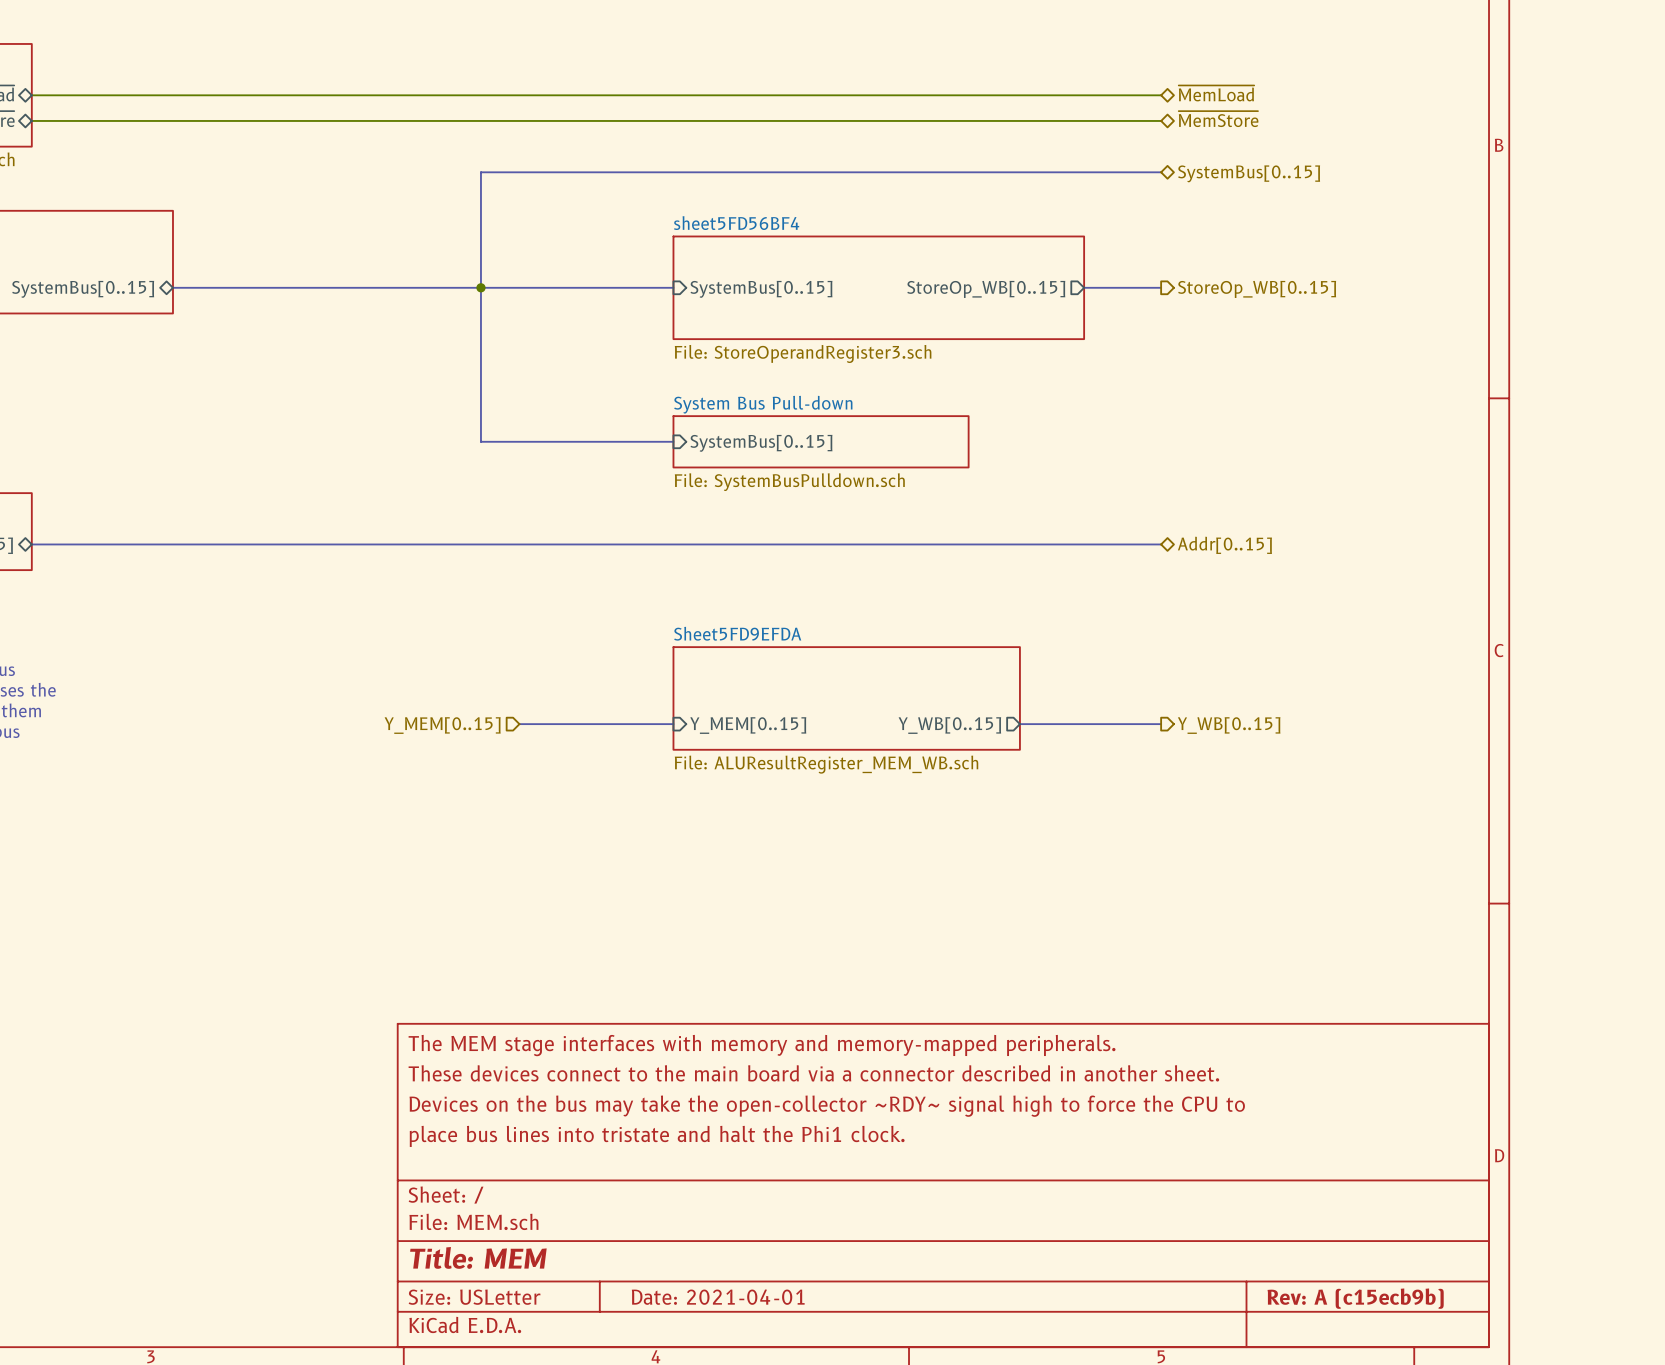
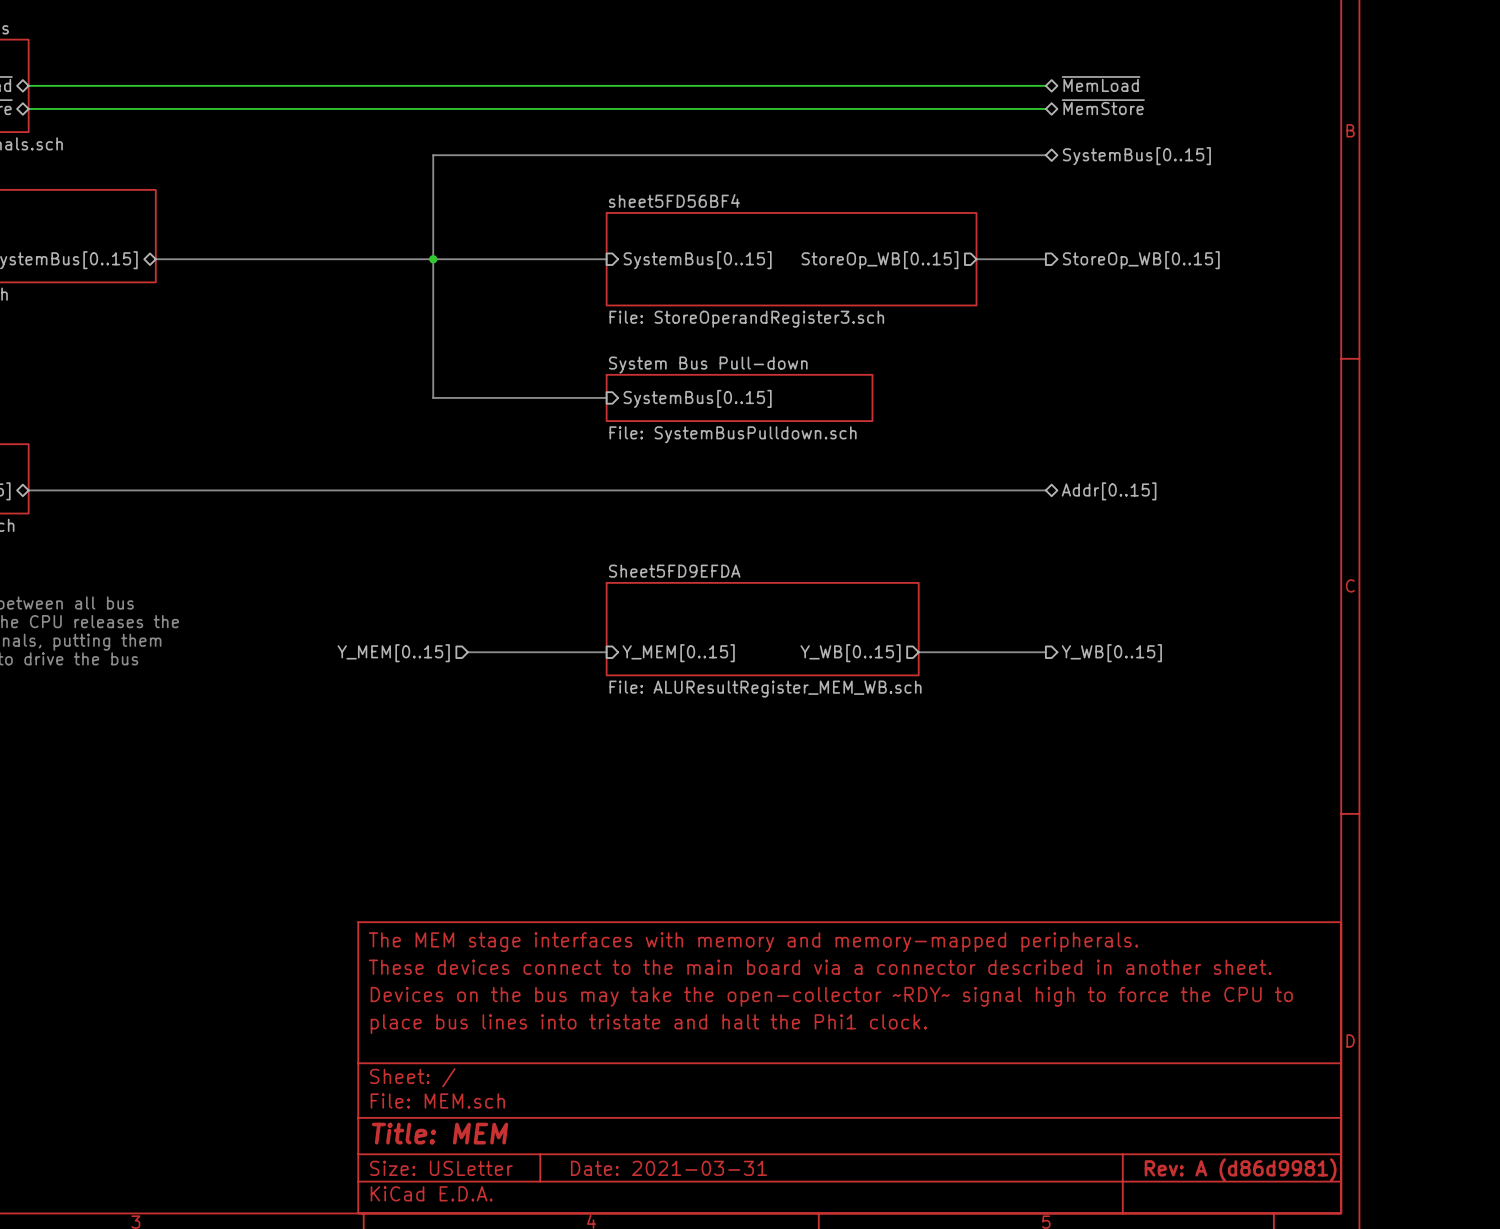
title block: Date: 2021-04-01 (718, 1297) -> Date: 2021-03-31 (668, 1168)
title block: Rev: A (c15ecb9b) (1355, 1298) -> Rev: A (d86d9981) (1240, 1169)

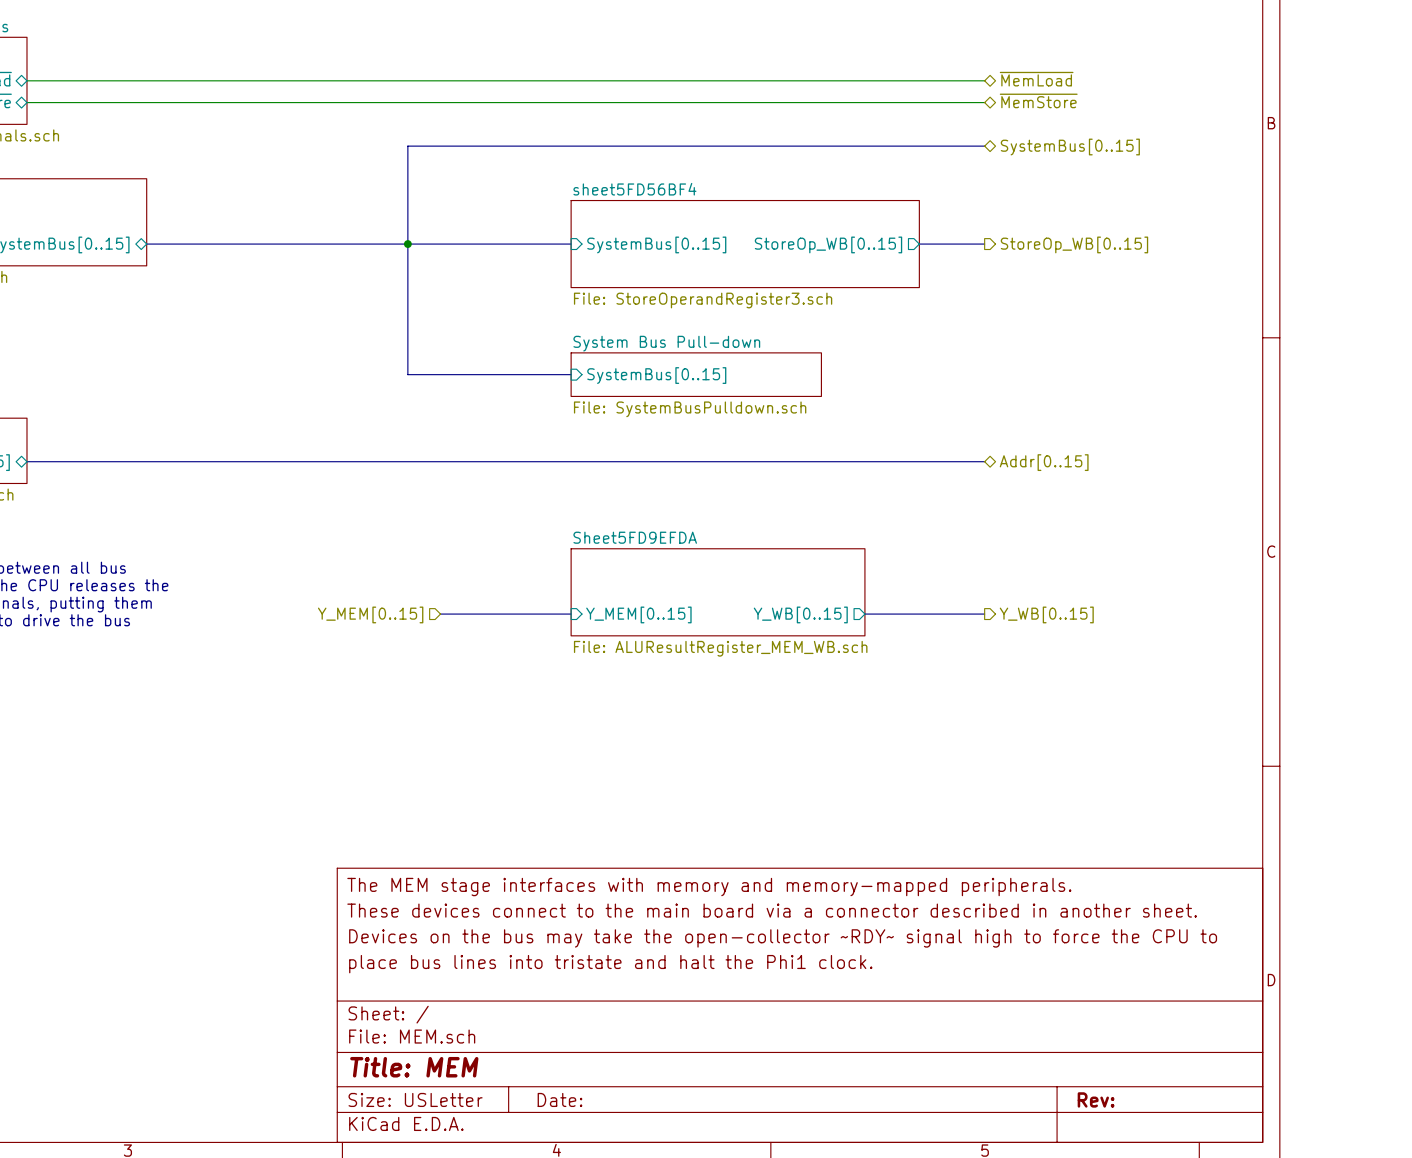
title block: Date: 2021-03-31 (668, 1168) -> Date: (560, 1099)
title block: Rev: A (d86d9981) (1240, 1169) -> Rev: (1096, 1099)

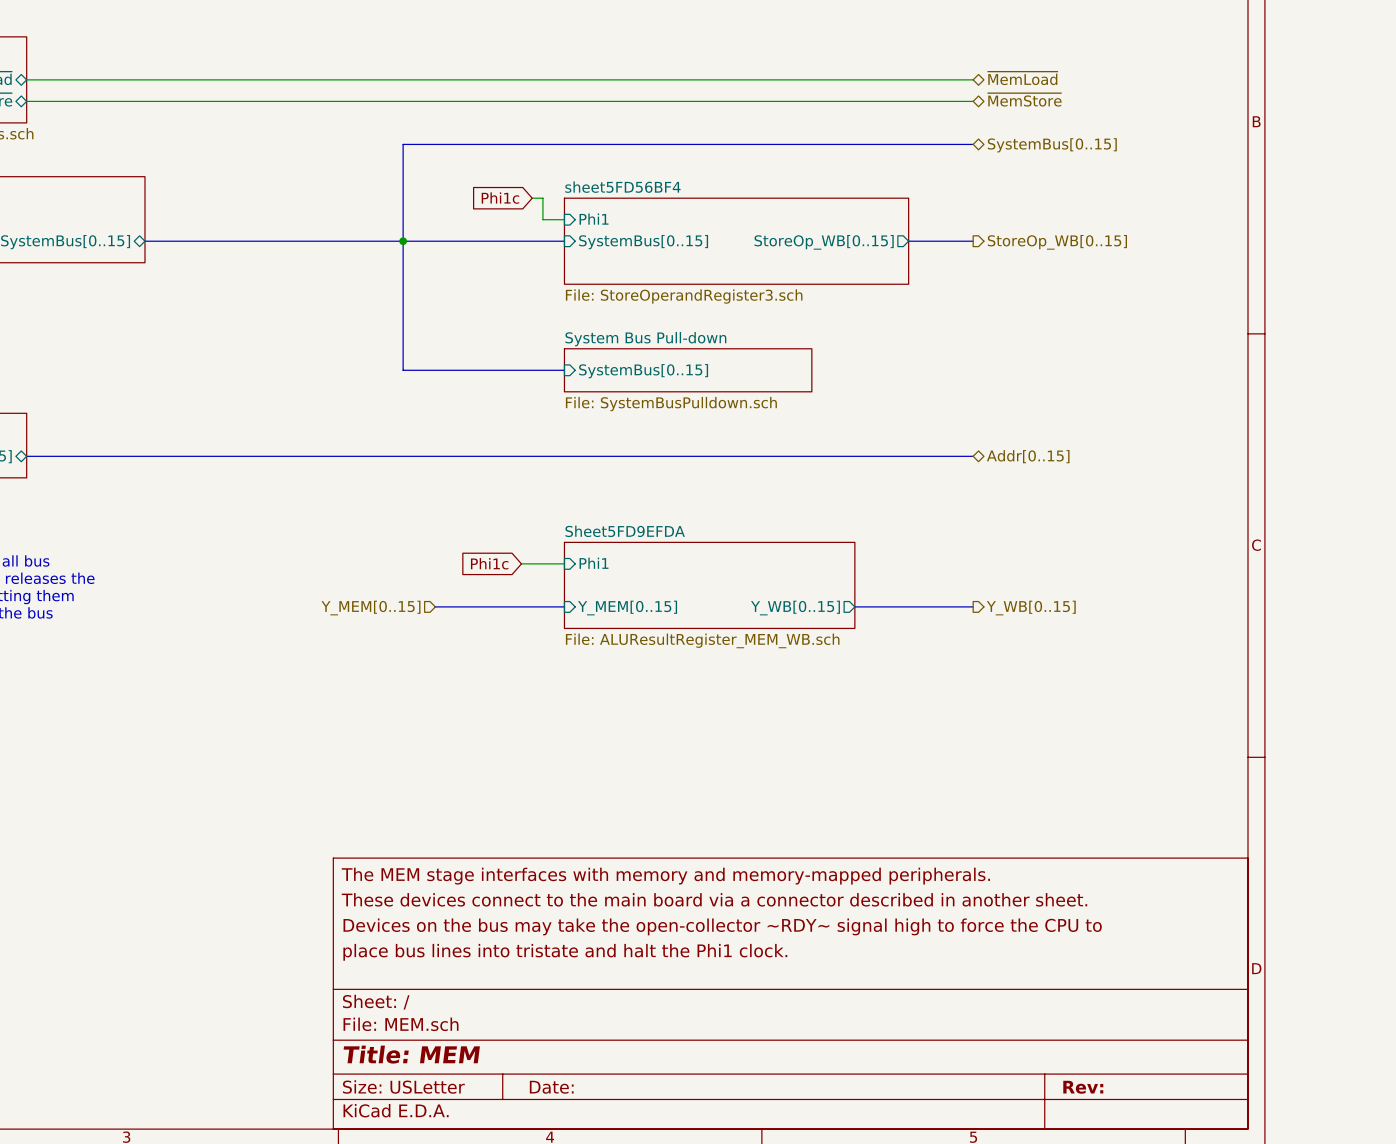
global label: none -> Phi1c (500, 198)
wire: none -> (532, 198) (542, 198) (542, 219) (564, 219)
sheet pin: none -> Phi1 (594, 219)
global label: none -> Phi1c (489, 563)
wire: none -> (521, 563) (564, 563)
sheet pin: none -> Phi1 (594, 563)

